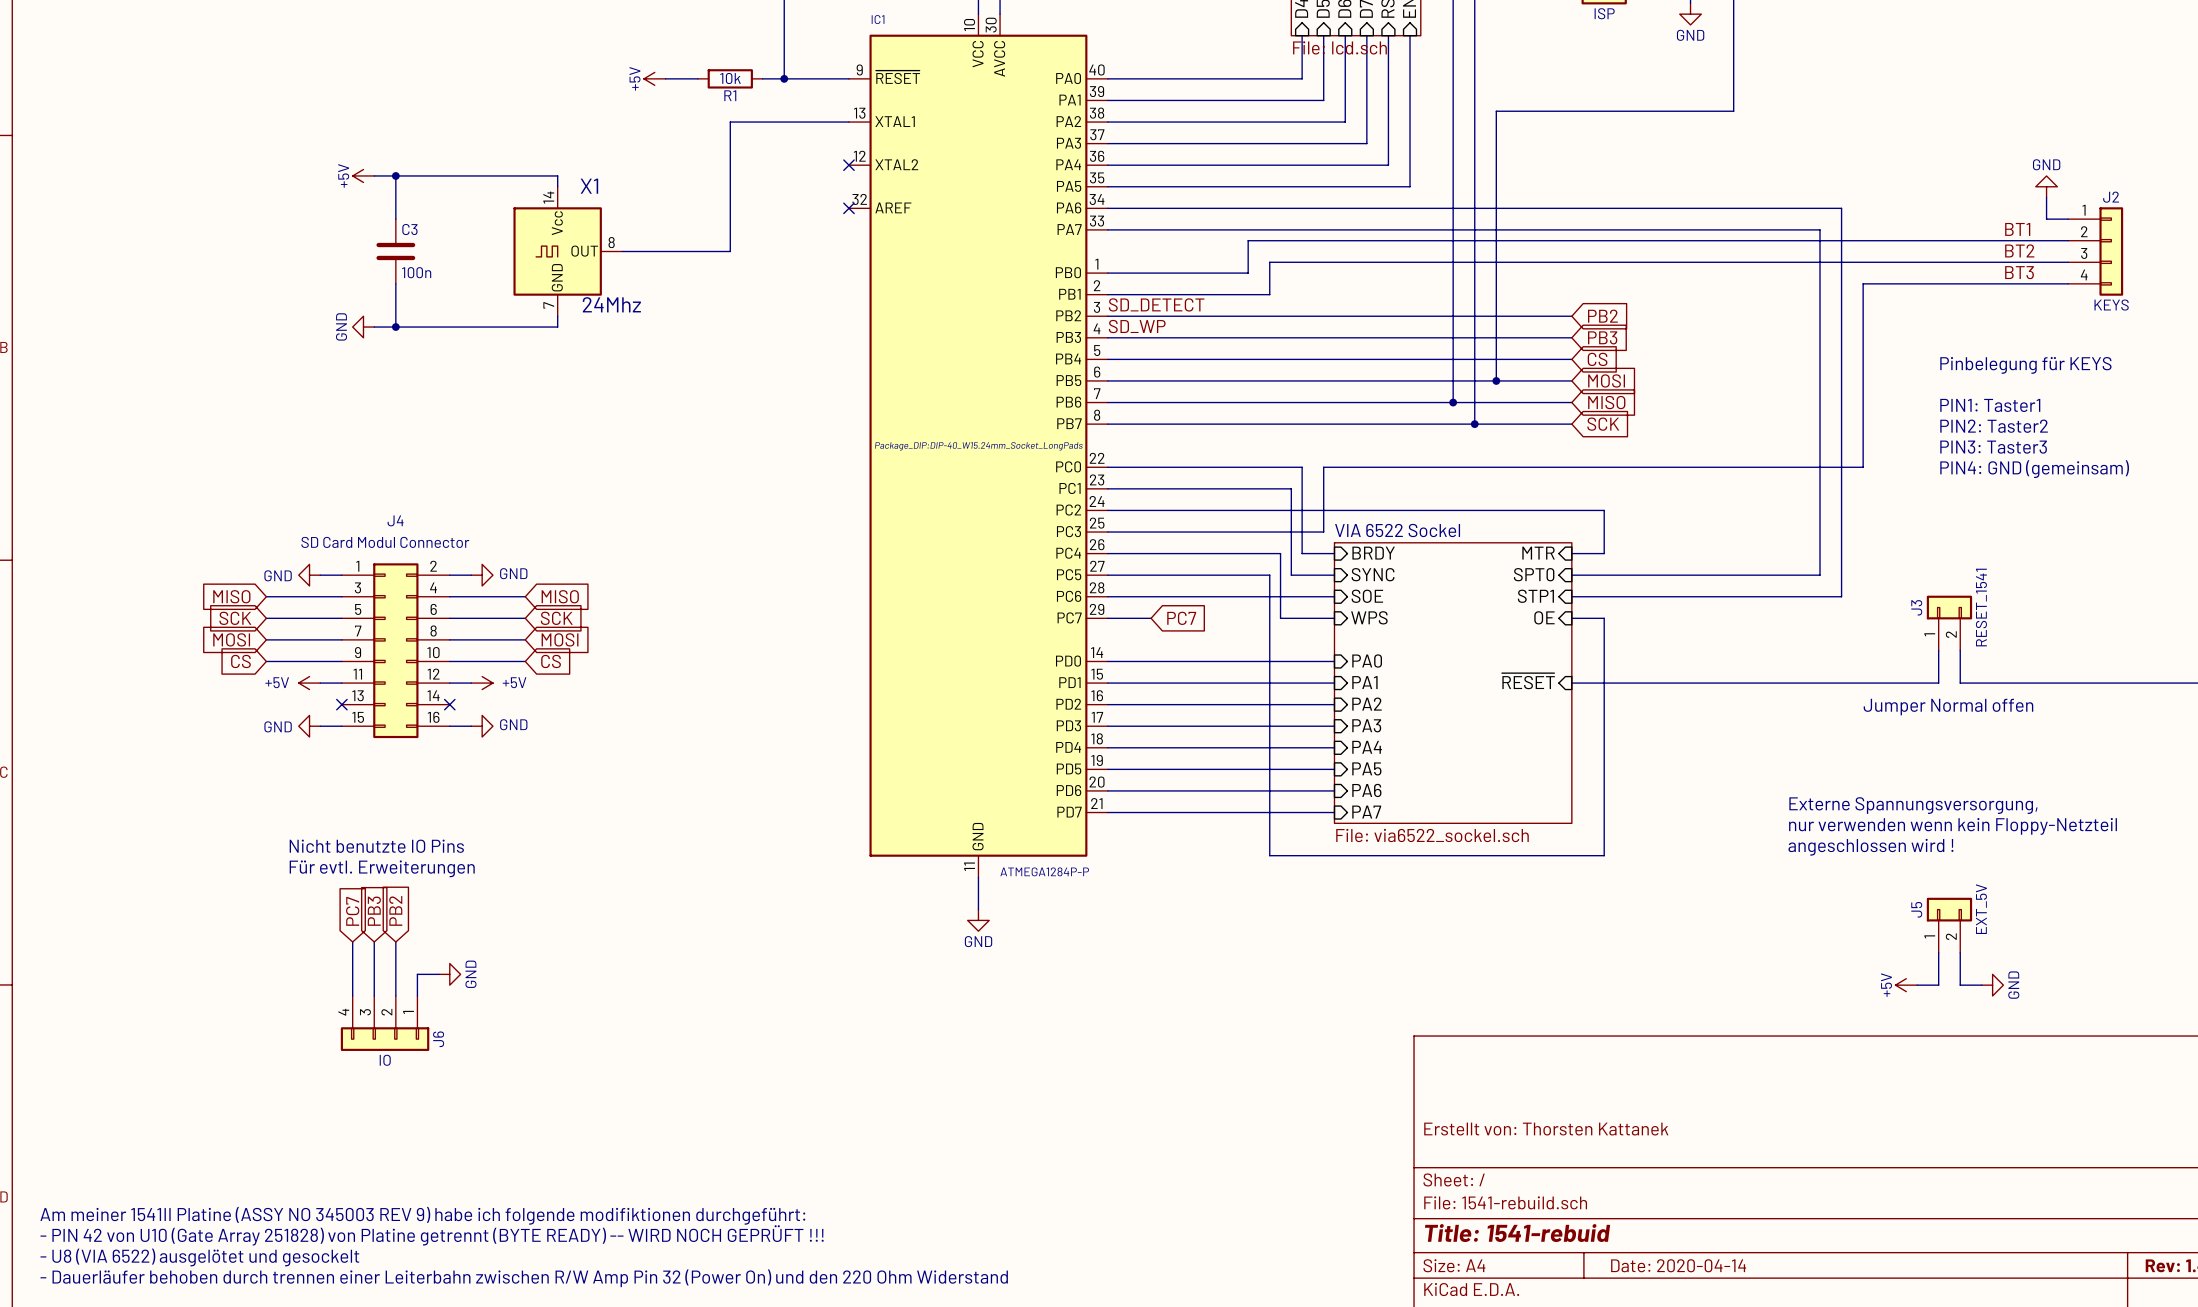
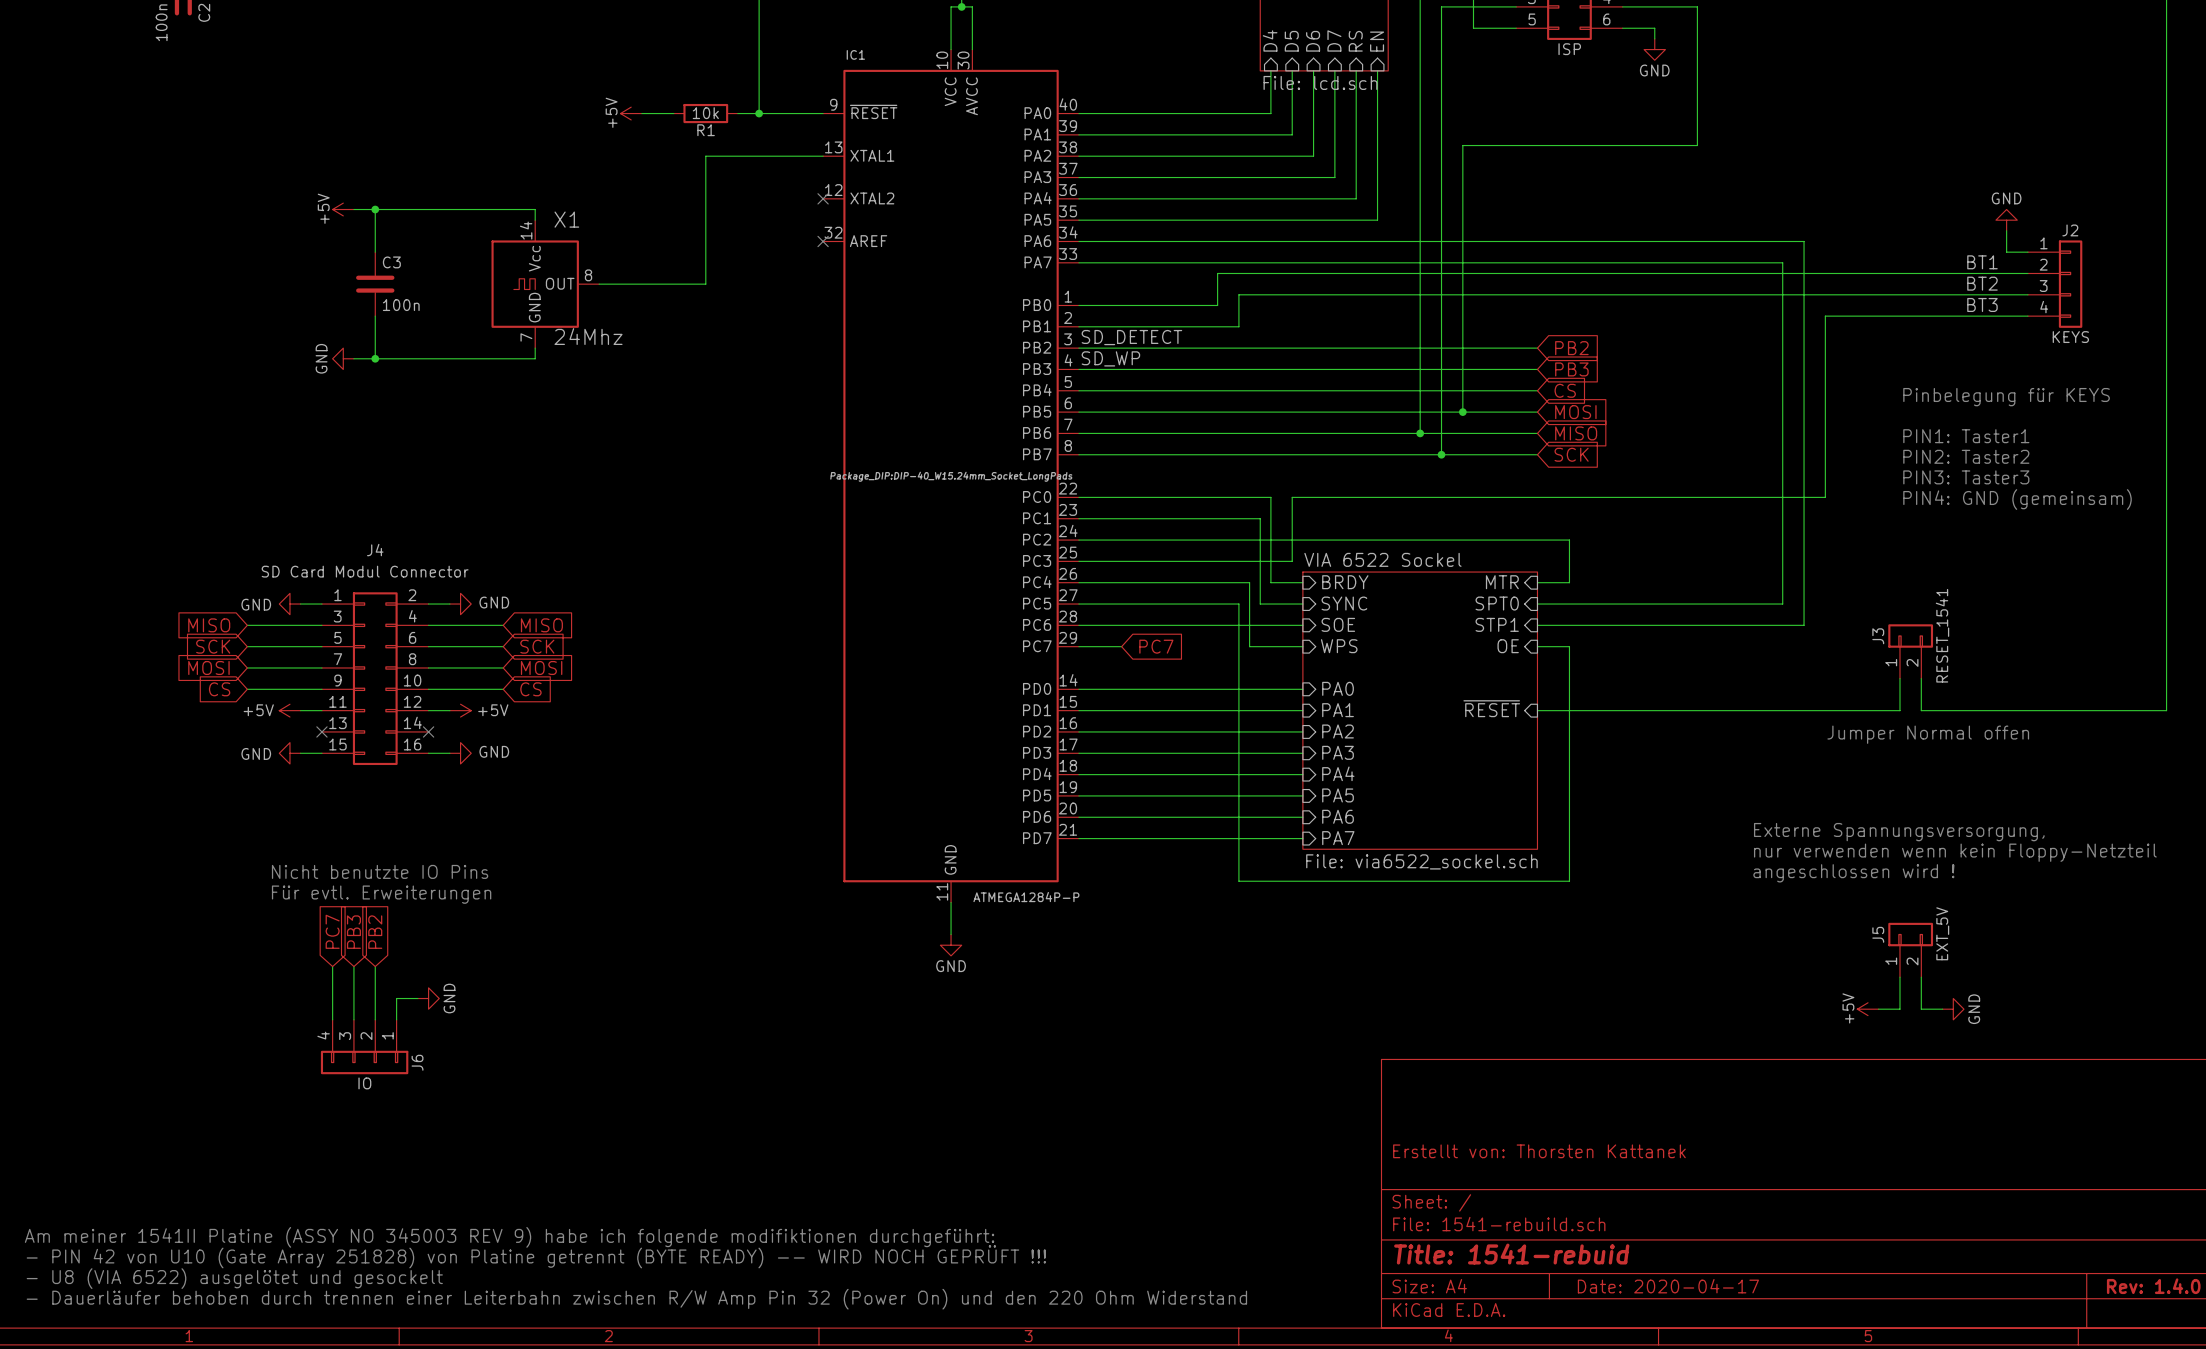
title block: Date: 2020-04-14 (1678, 1265) -> Date: 2020-04-17 (1668, 1286)

